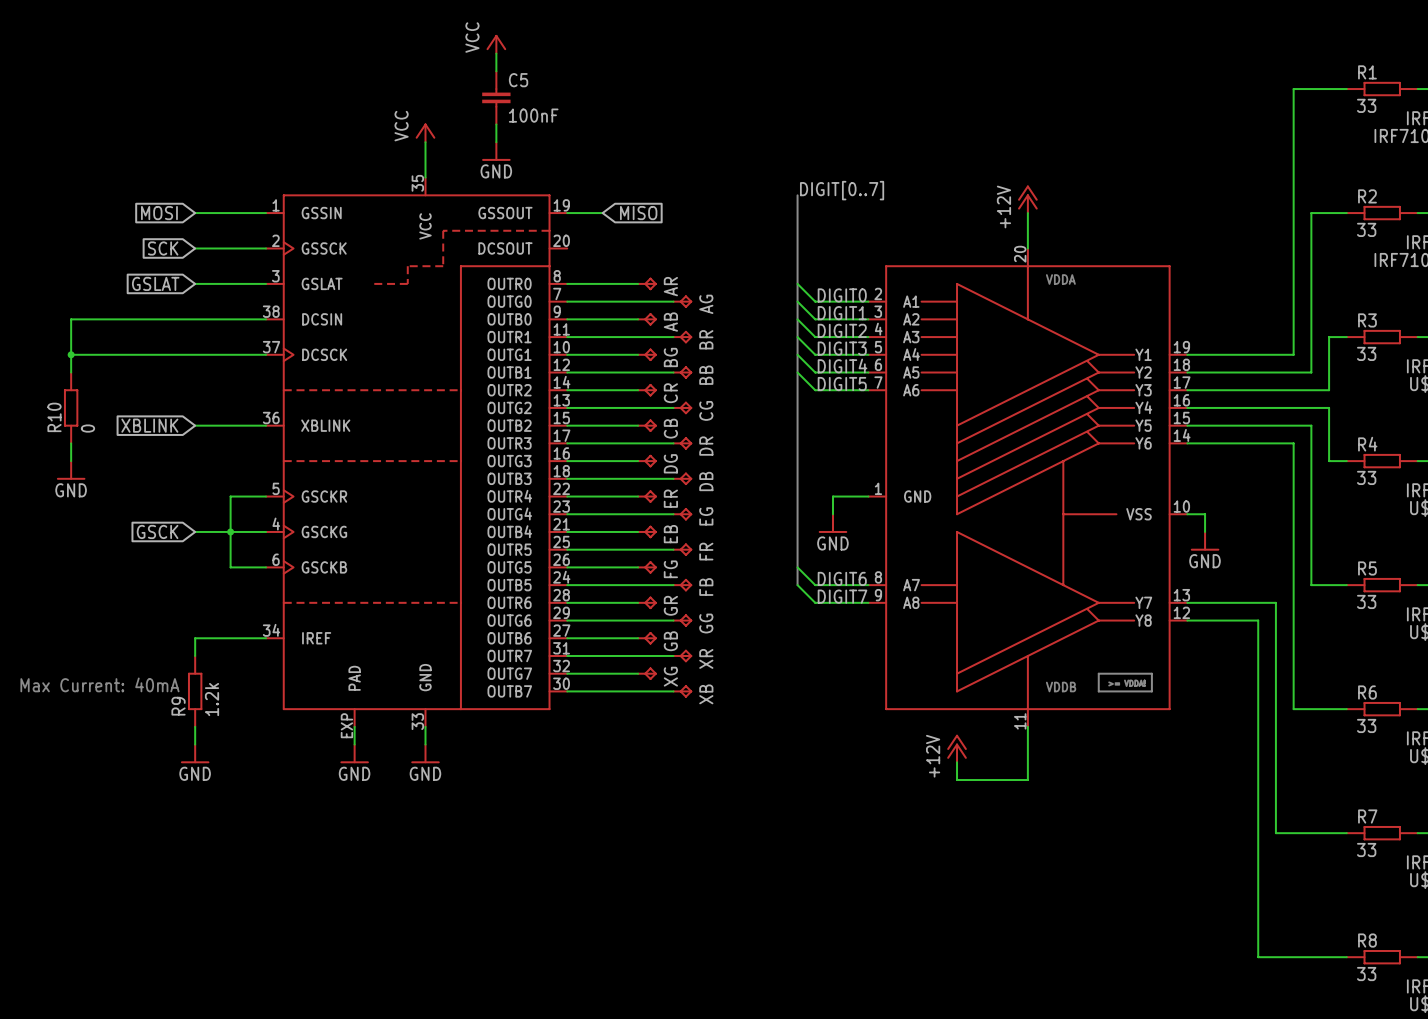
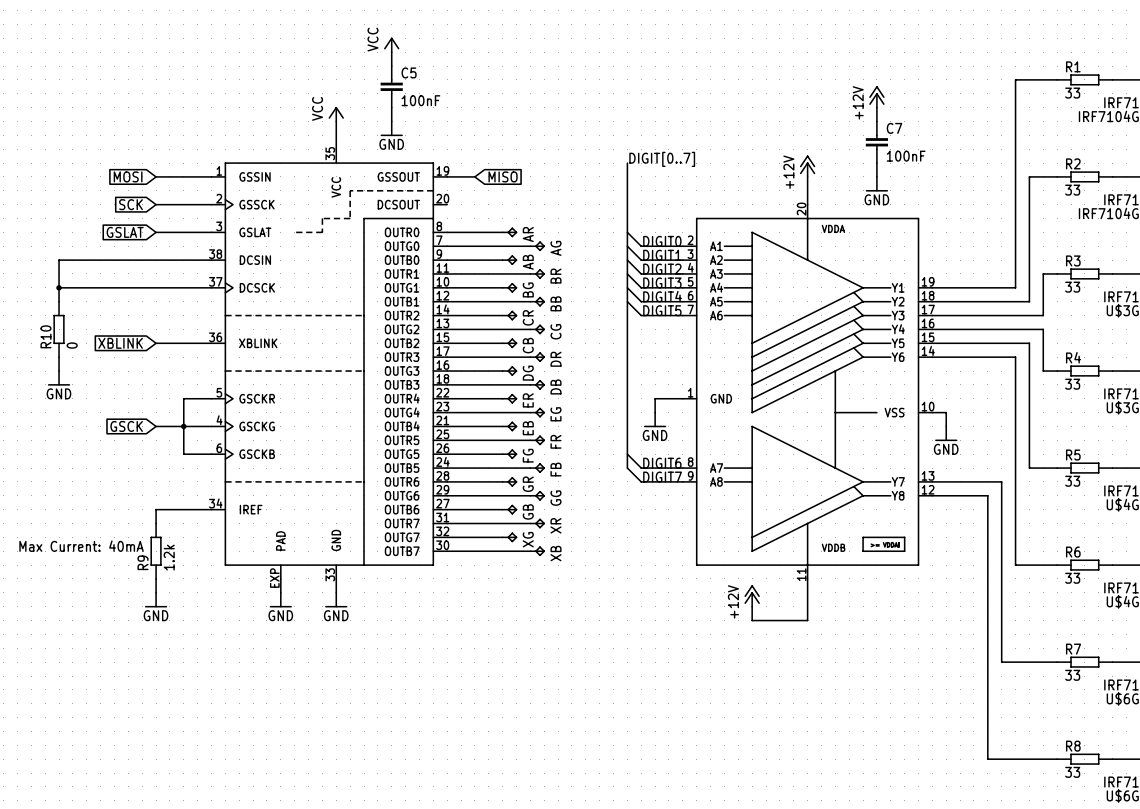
power symbol: none -> +12V (876, 96)
wire: none -> (876, 107) (876, 121)
C7: none -> 100nF (876, 142)
wire: none -> (876, 163) (876, 176)
power symbol: none -> GND (876, 184)

